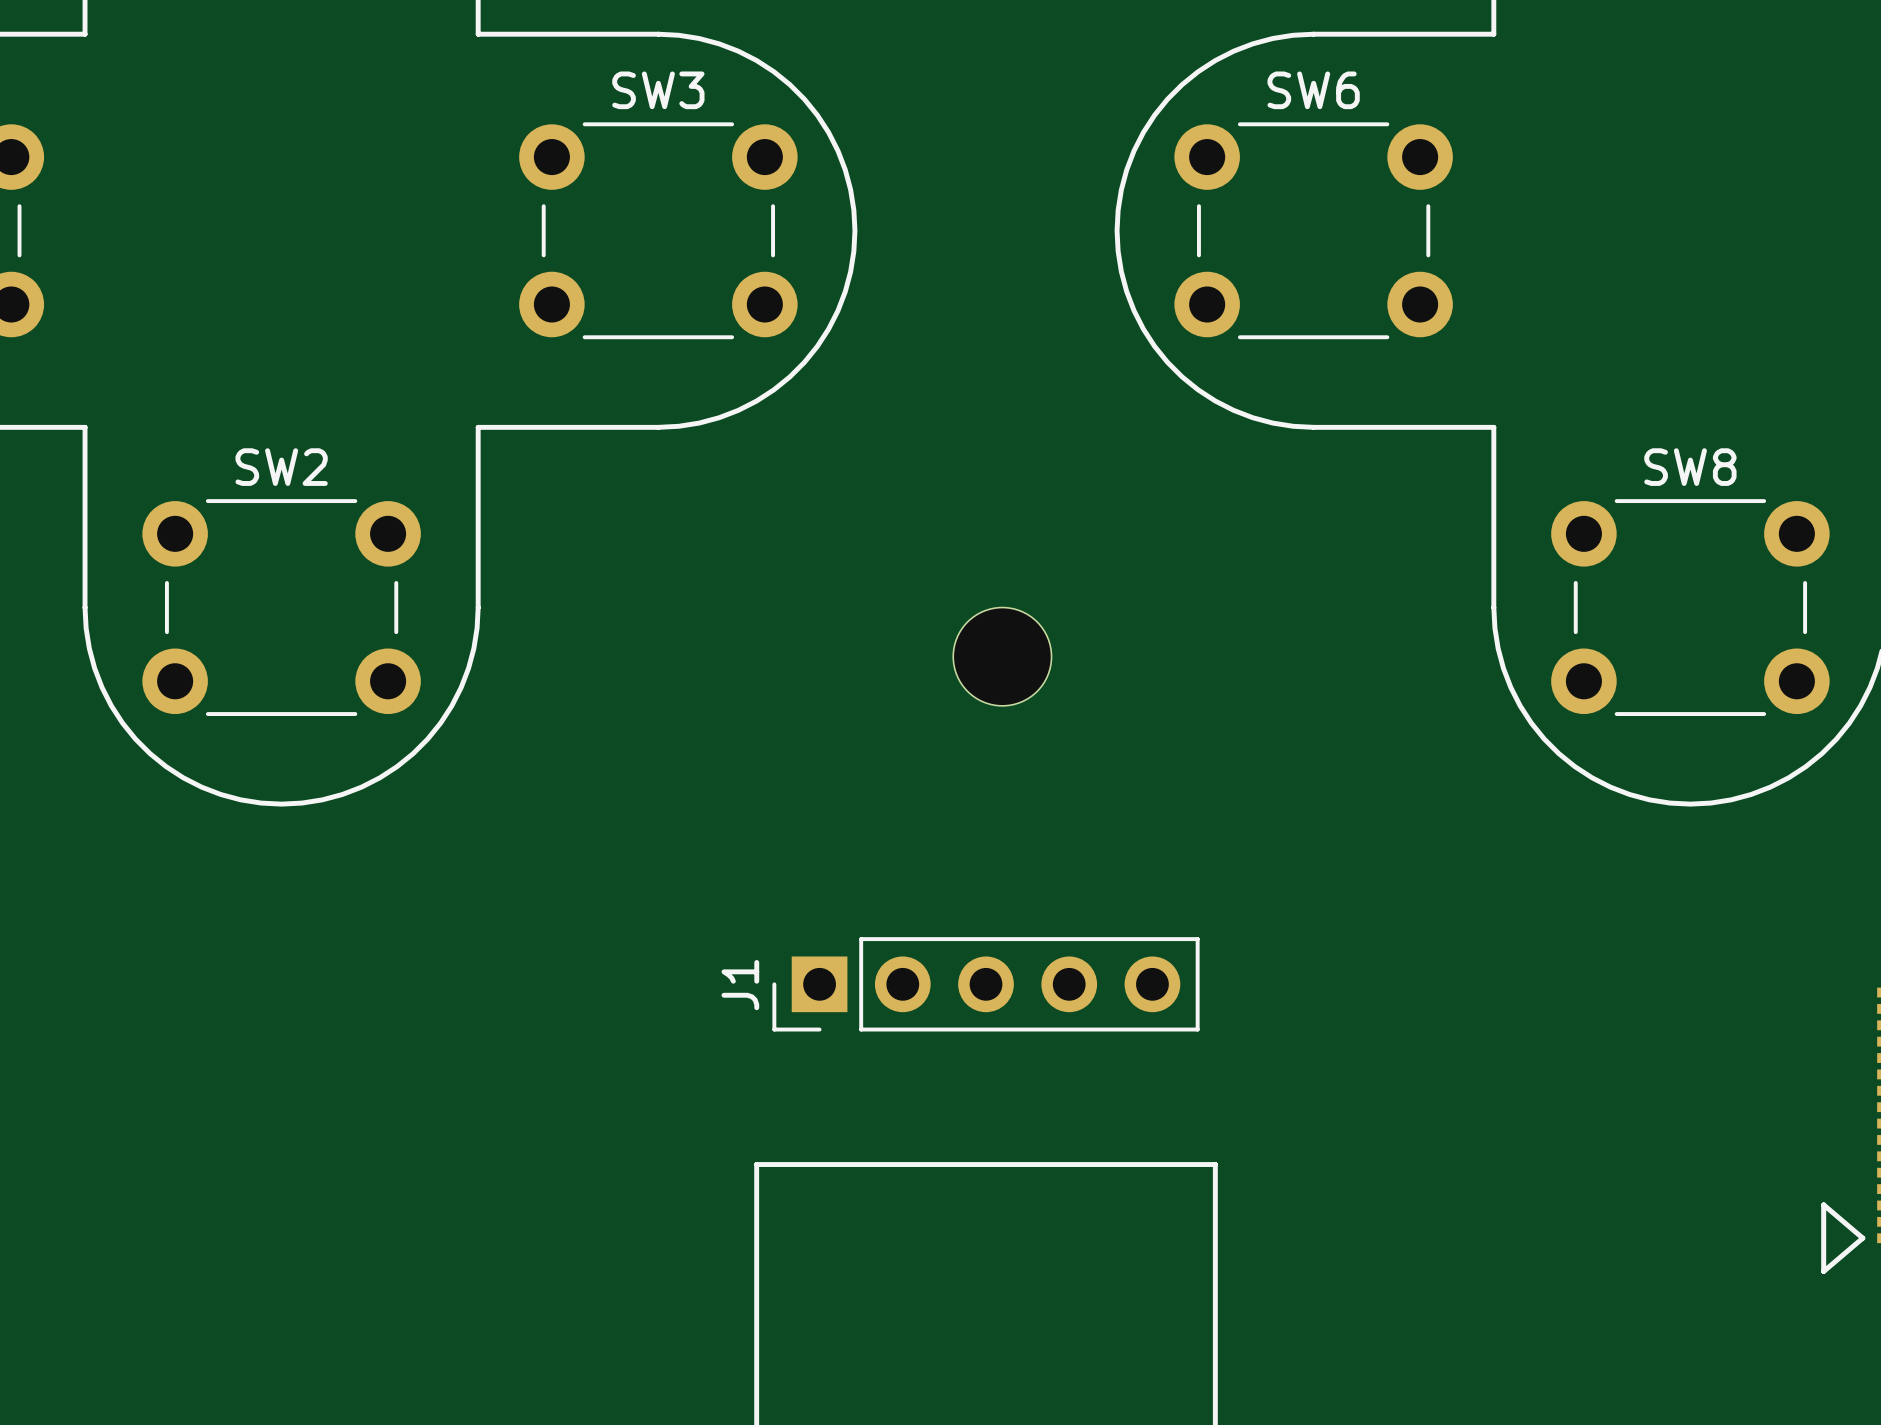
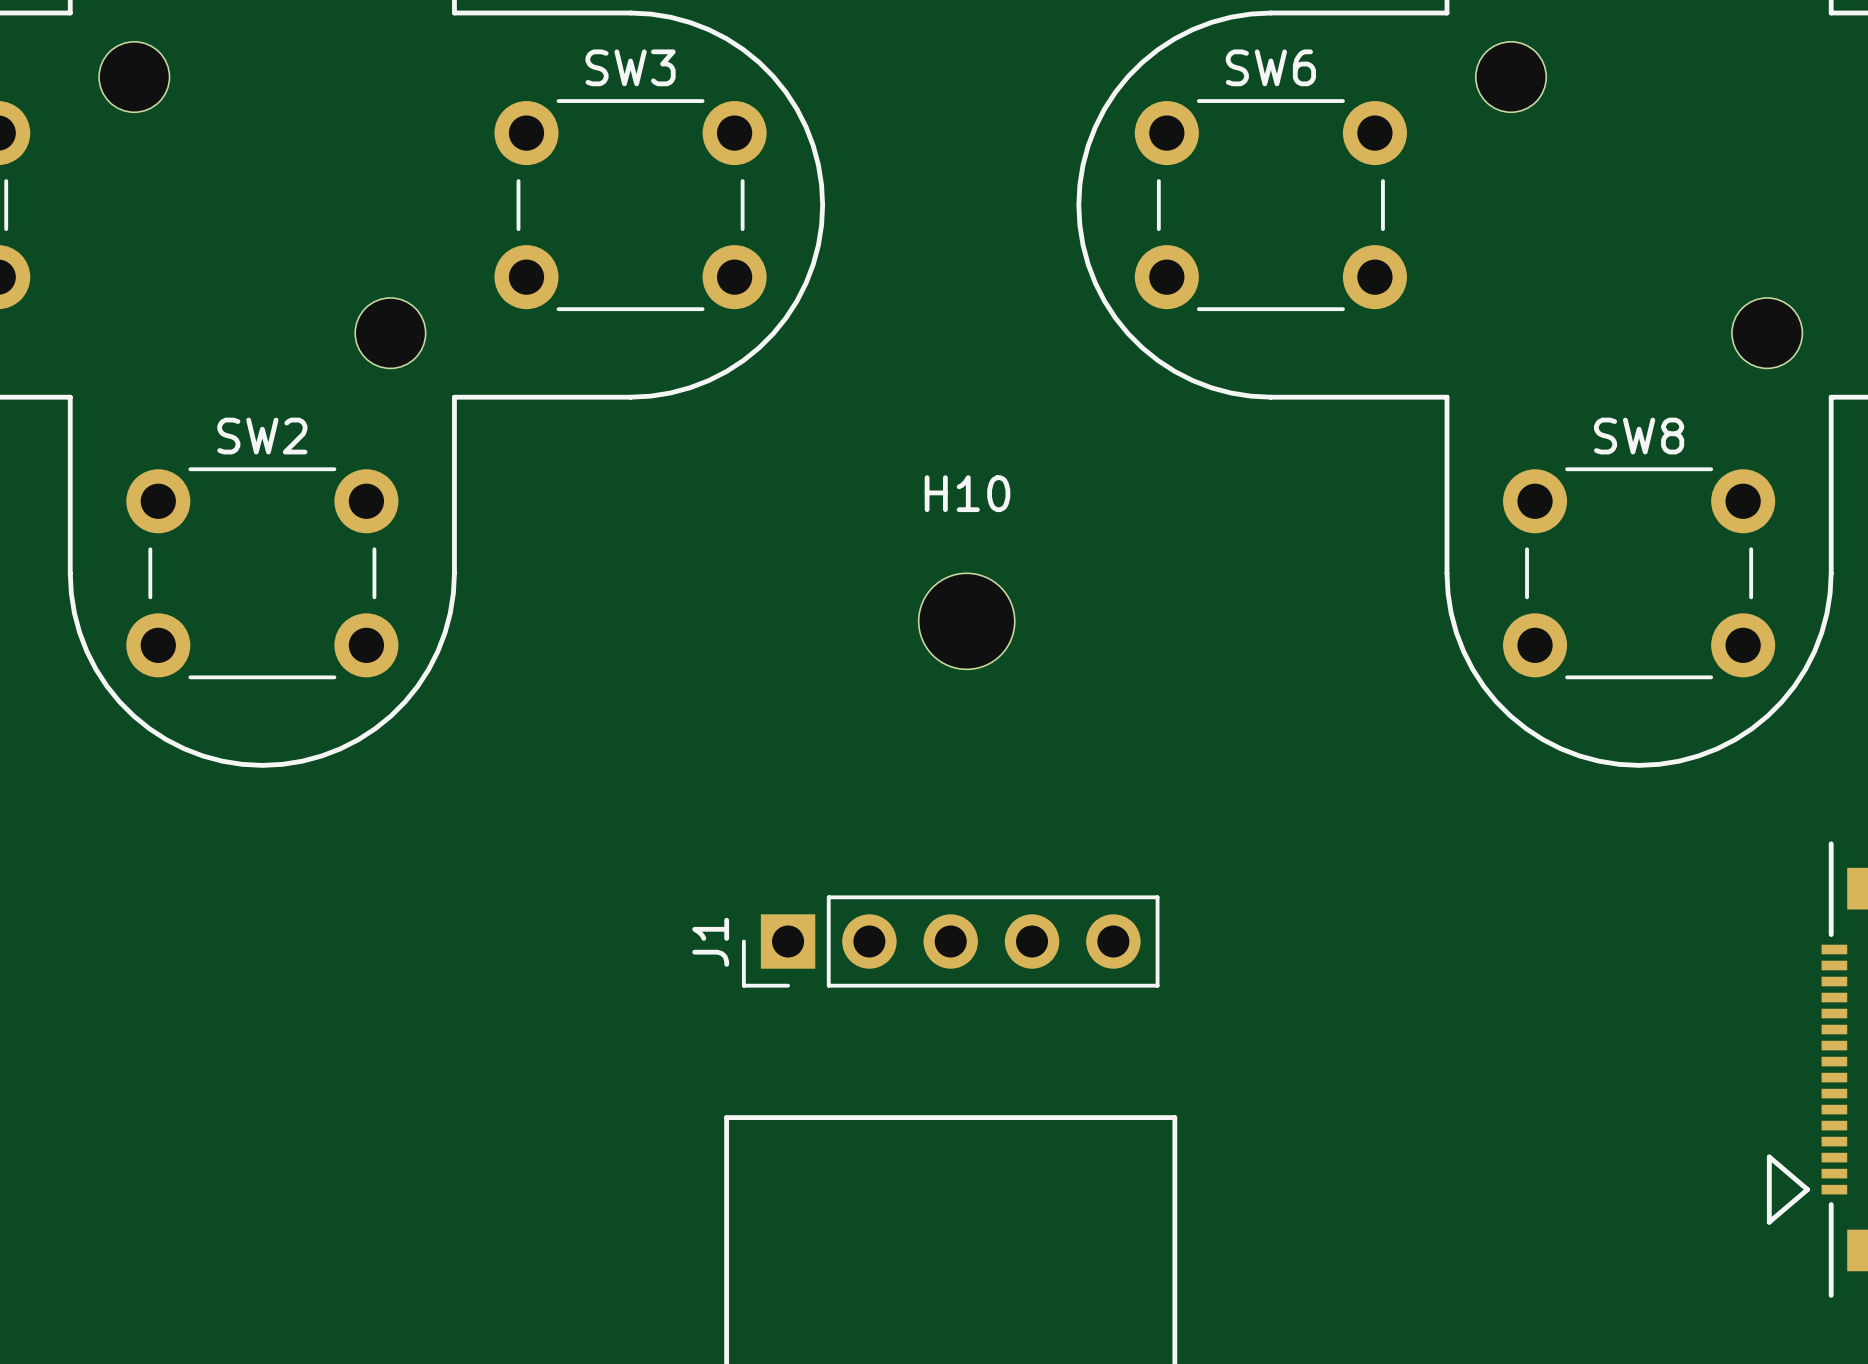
part: none -> (134, 77)
part: none -> (1511, 77)
part: none -> (390, 333)
part: none -> (1767, 333)
H10 name: none -> H10 (967, 493)

